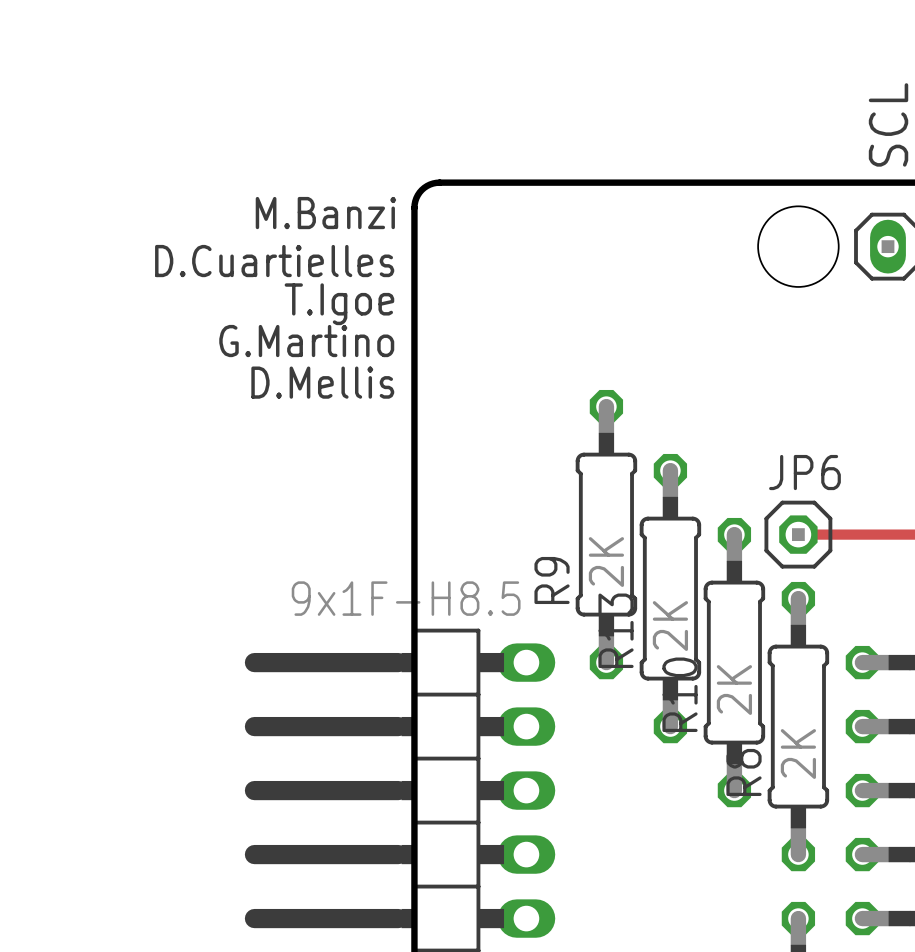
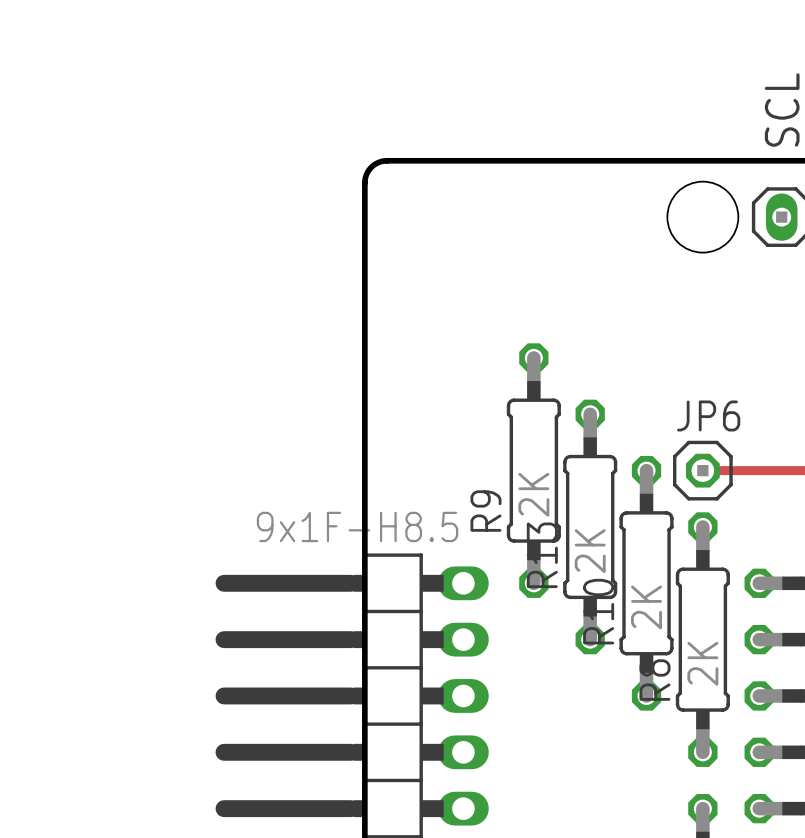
text: M.Banzi (325, 213) -> none
text: D.Cuartielles (274, 261) -> none
text: T.Igoe (339, 304) -> none
text: G.Martino (306, 341) -> none
text: D.Mellis (322, 382) -> none

